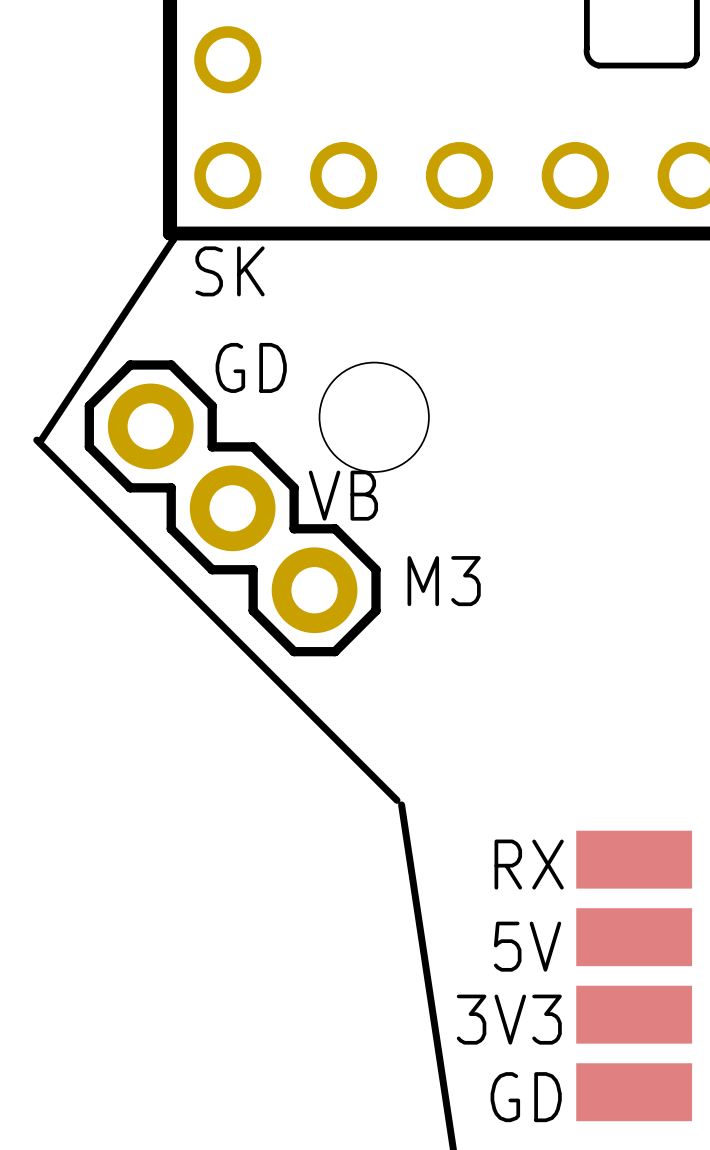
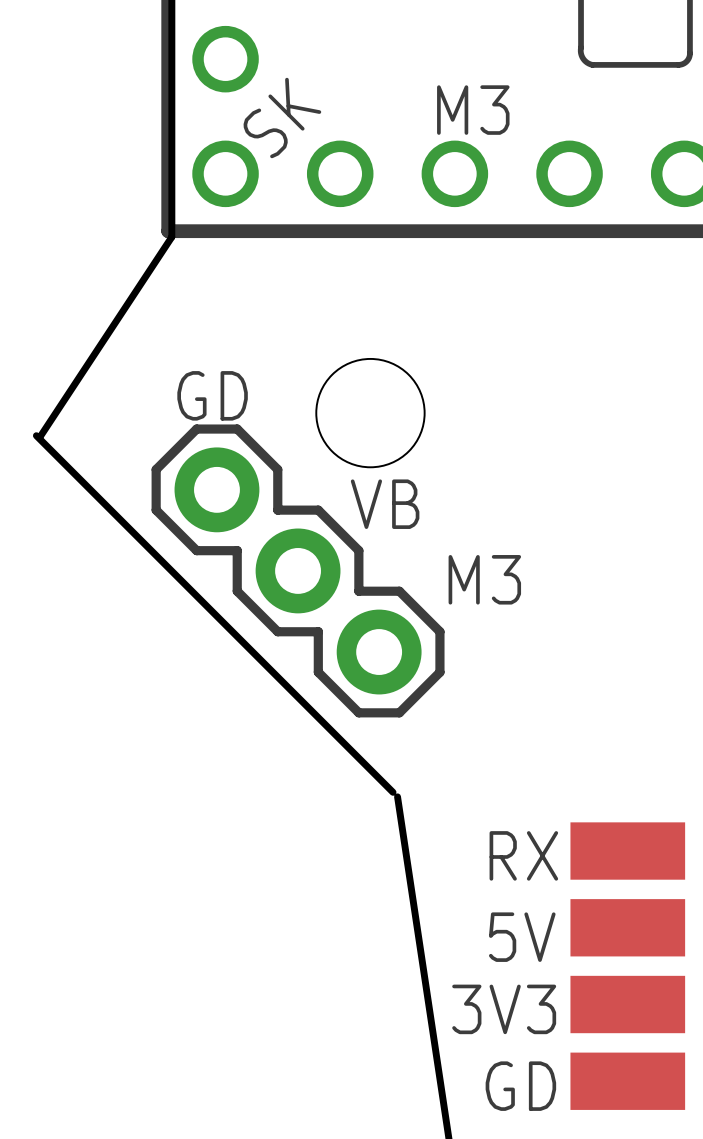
text: none -> M3 (473, 110)
text rotation: 0° (230, 271) -> 45° counterclockwise (282, 118)
text position: SK (230, 271) -> SK (282, 118)
text position: GD (251, 367) -> GD (212, 395)
text position: VB (343, 495) -> VB (385, 504)
part position: (232, 508) -> (298, 570)
text position: M3 (444, 581) -> M3 (484, 579)

